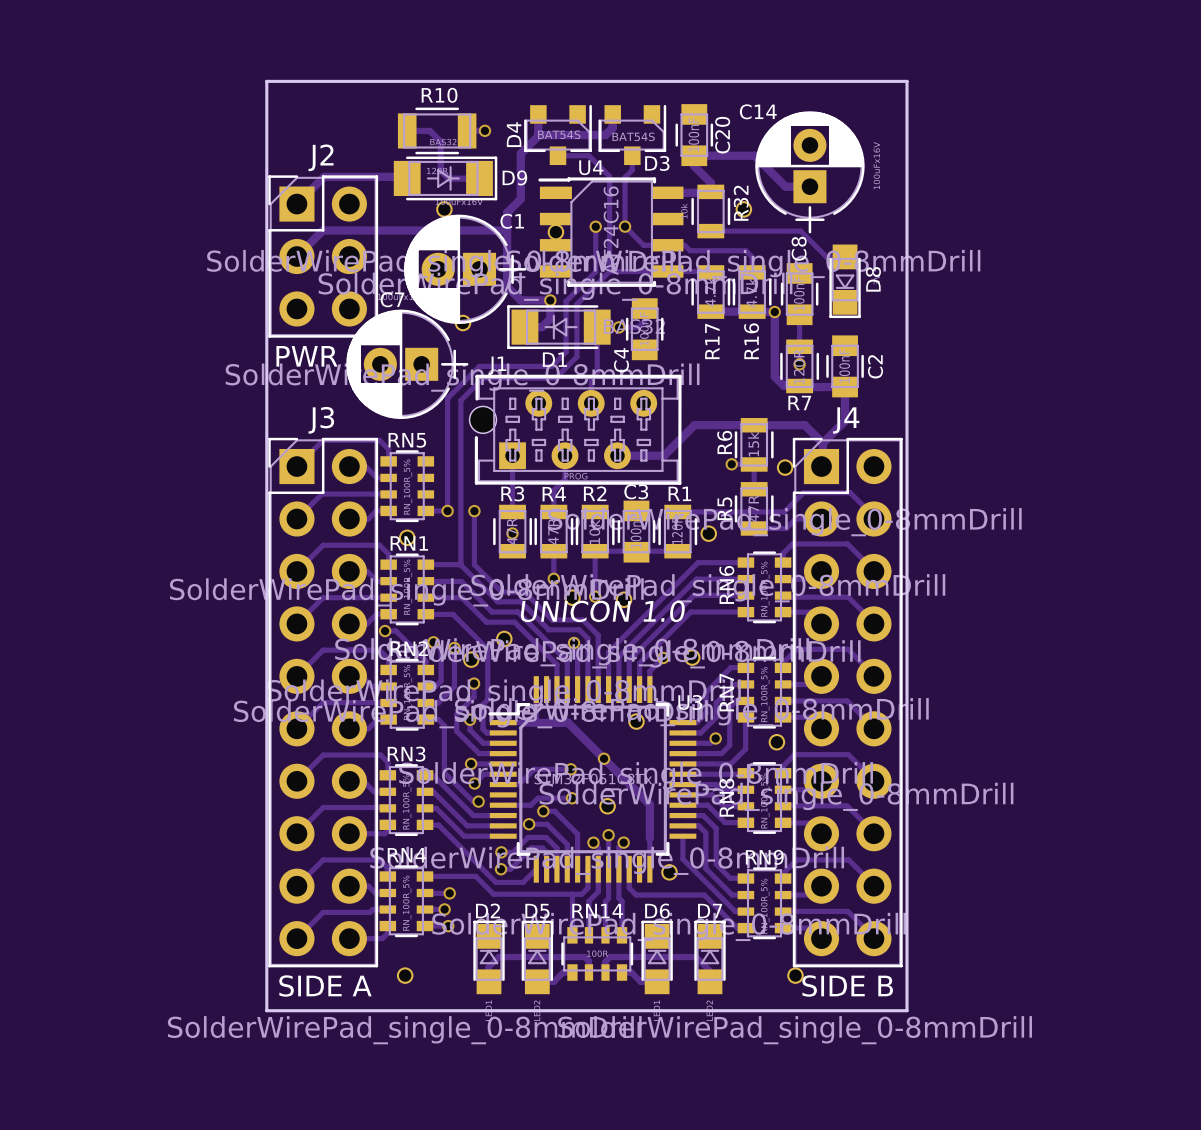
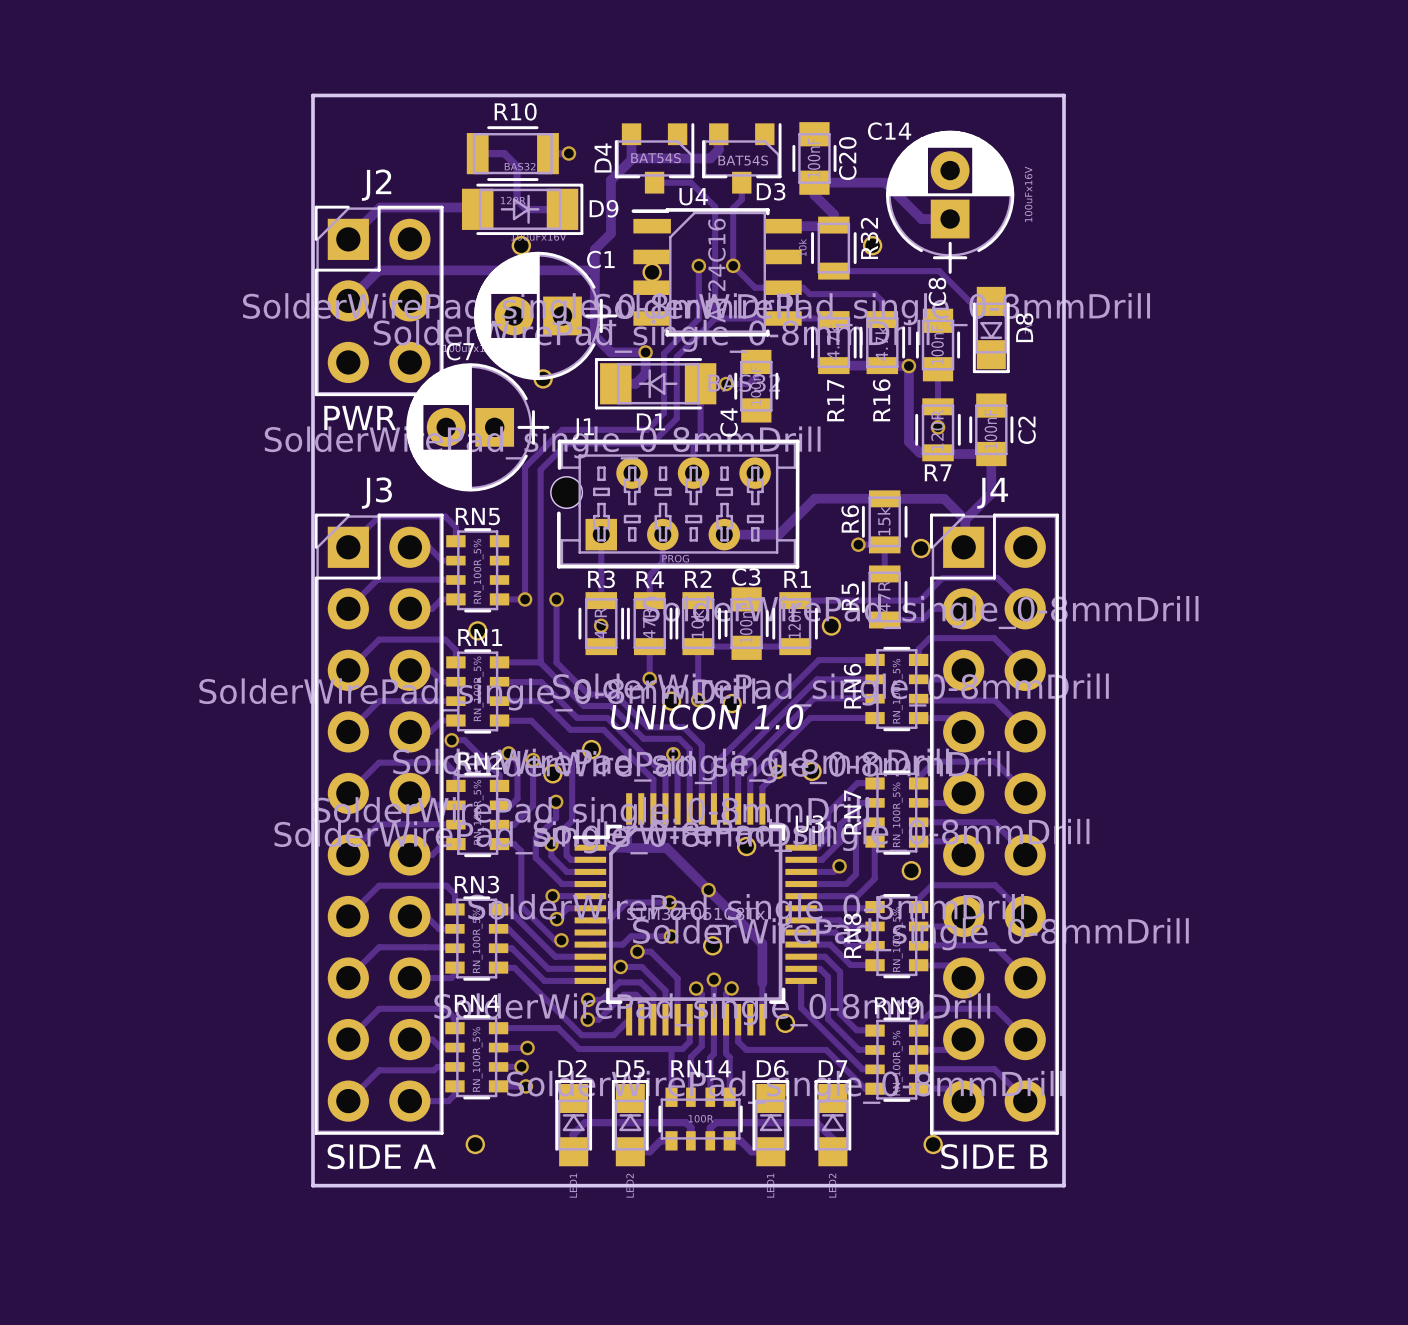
part value: SolderWirePad_single_0-8mmDrill (404, 1030) -> none
part value: SolderWirePad_single_0-8mmDrill (795, 1030) -> none

